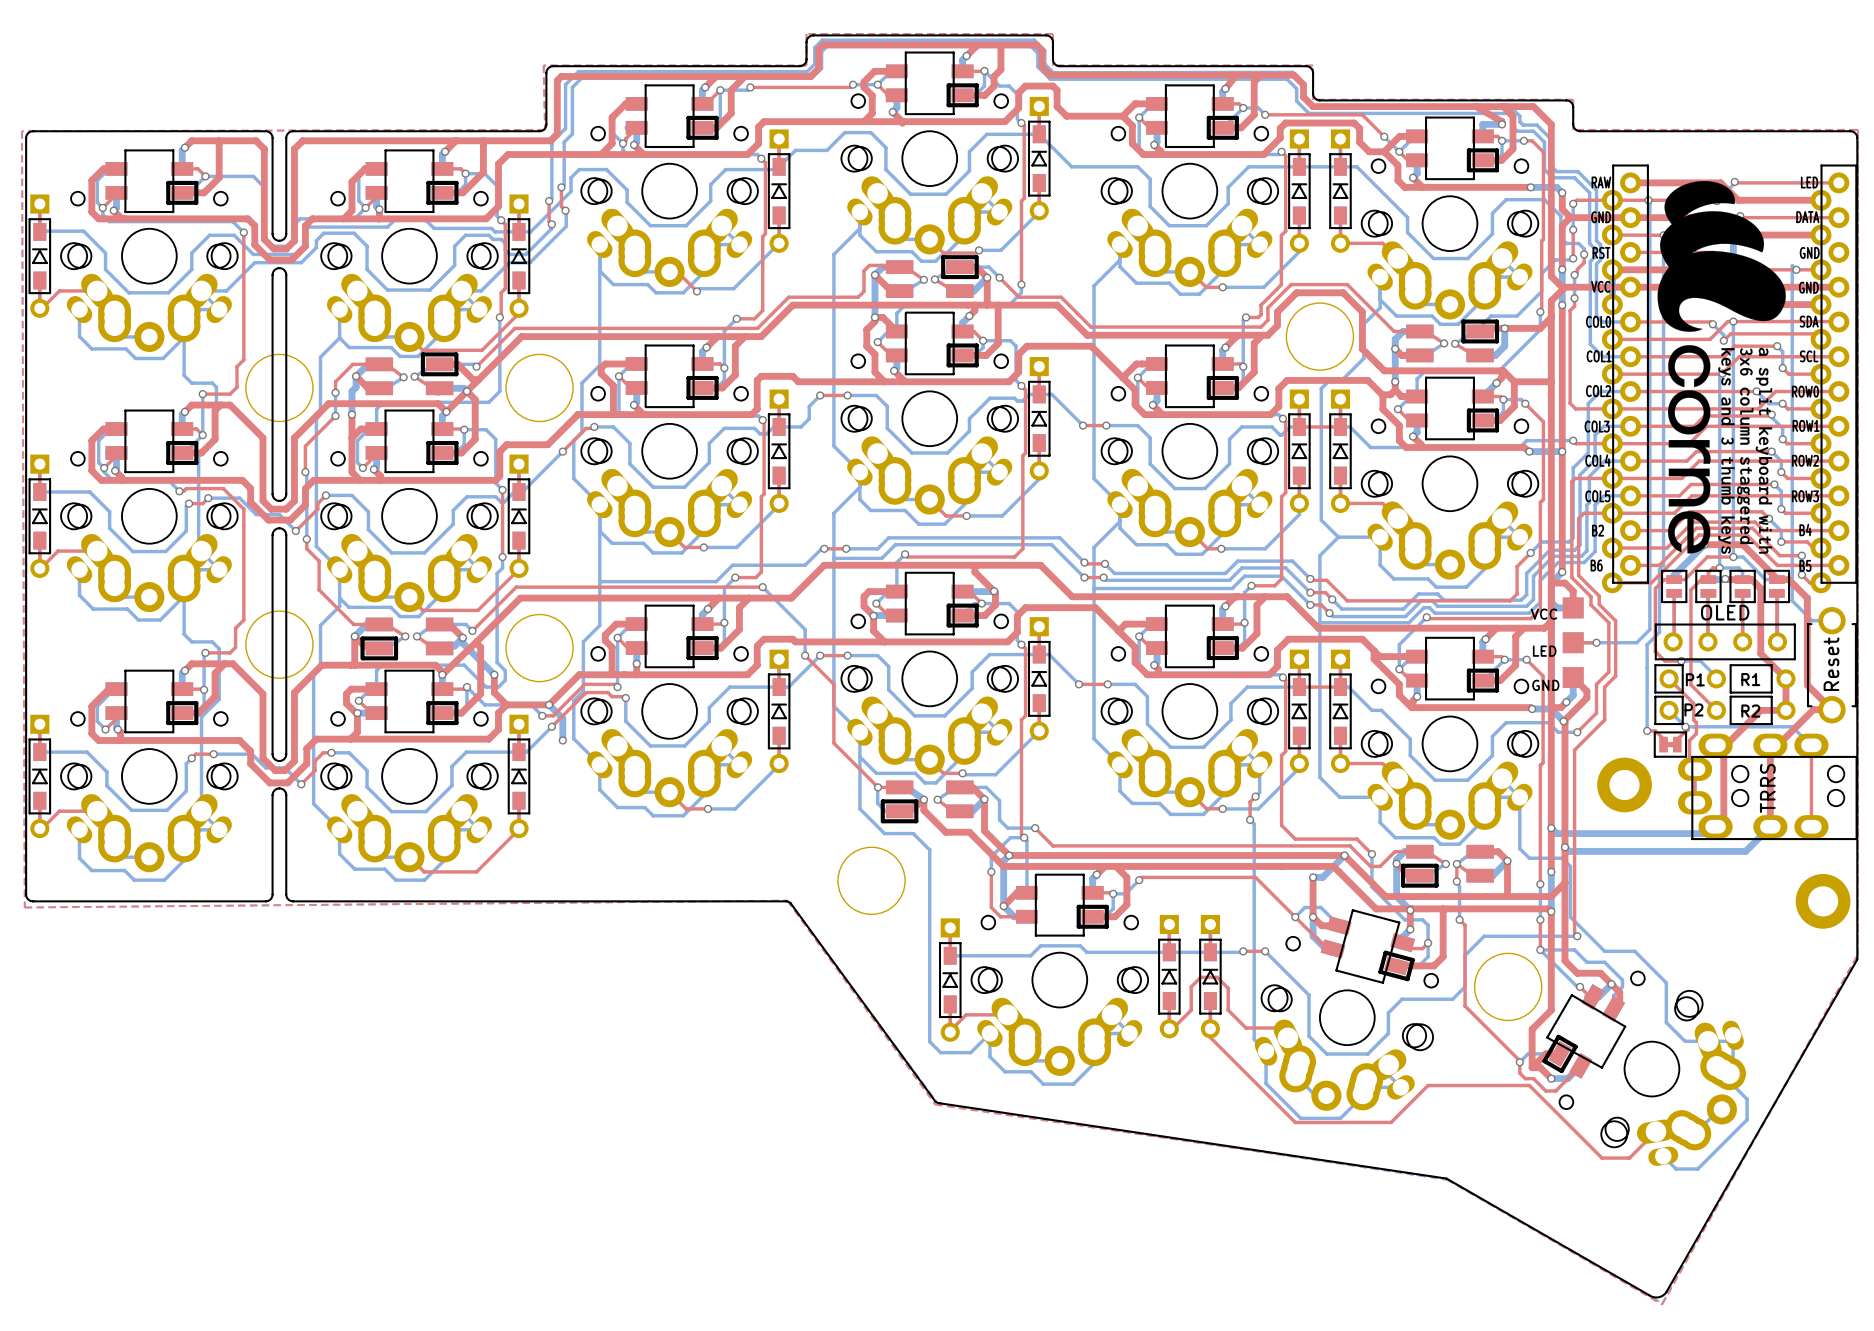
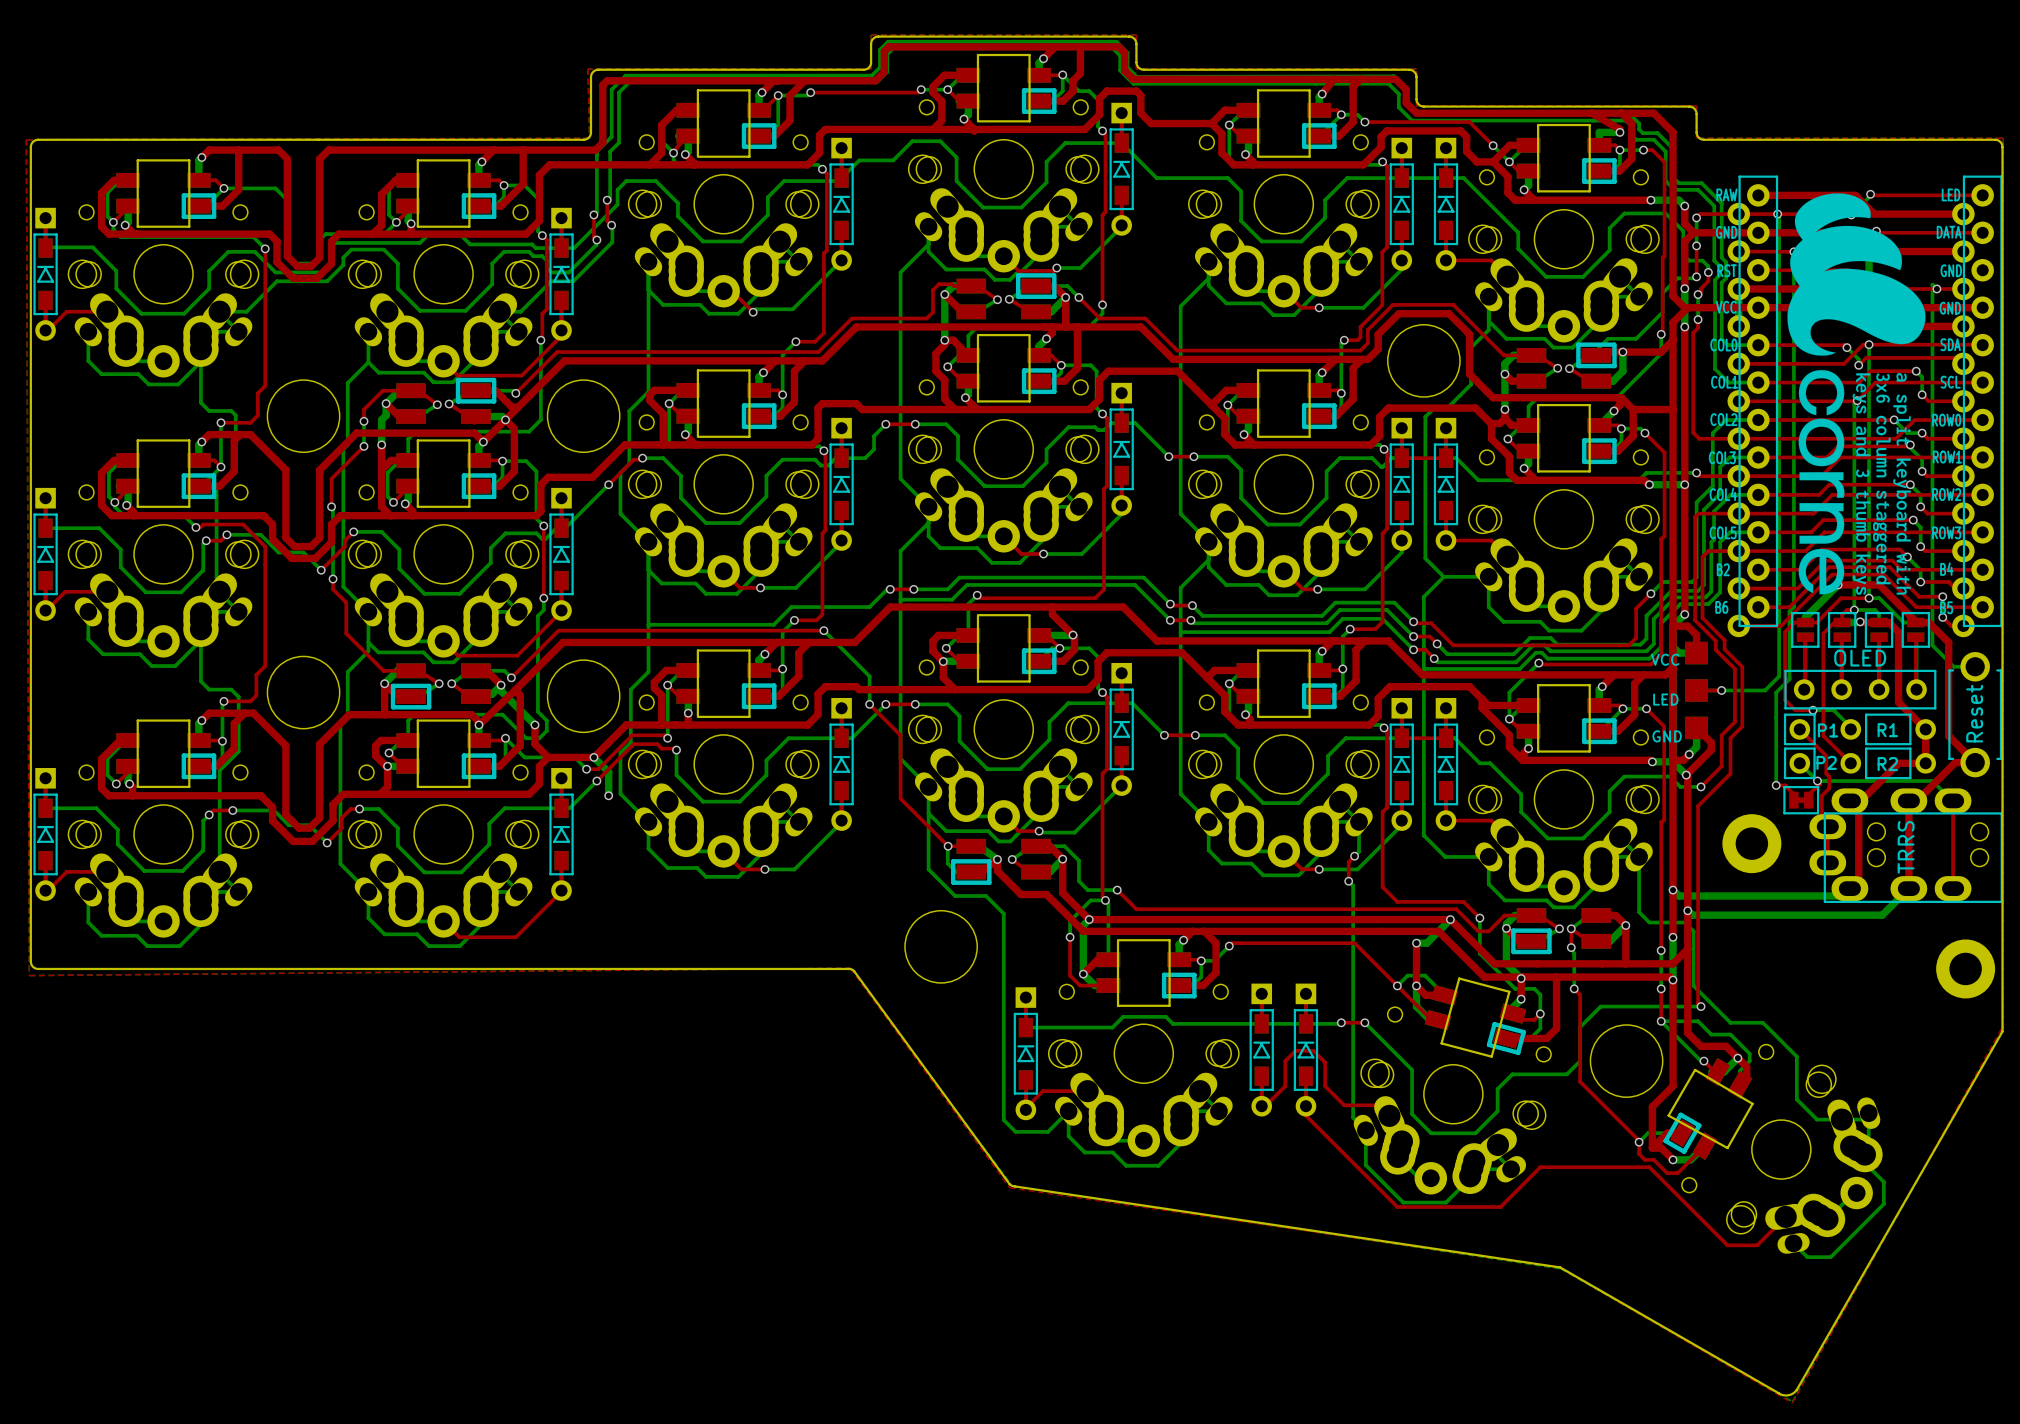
board edge: (265, 131) (269, 132) (272, 137) (272, 234) (275, 239) (279, 240) (283, 239) (286, 234) (286, 137) (288, 132) (293, 131) -> (288, 139) (318, 139)
board edge: (279, 268) (284, 270) (286, 274) (286, 494) (284, 498) (279, 500) (274, 498) (272, 494) (272, 274) (274, 270) (279, 268) -> none
board edge: (279, 528) (274, 530) (272, 535) (272, 754) (274, 759) (279, 761) (284, 759) (286, 754) (286, 535) (284, 530) (279, 528) -> none
board edge: (265, 901) (269, 899) (272, 895) (272, 795) (274, 790) (279, 788) (283, 789) (286, 794) (286, 894) (288, 899) (293, 901) -> (288, 968) (318, 968)

